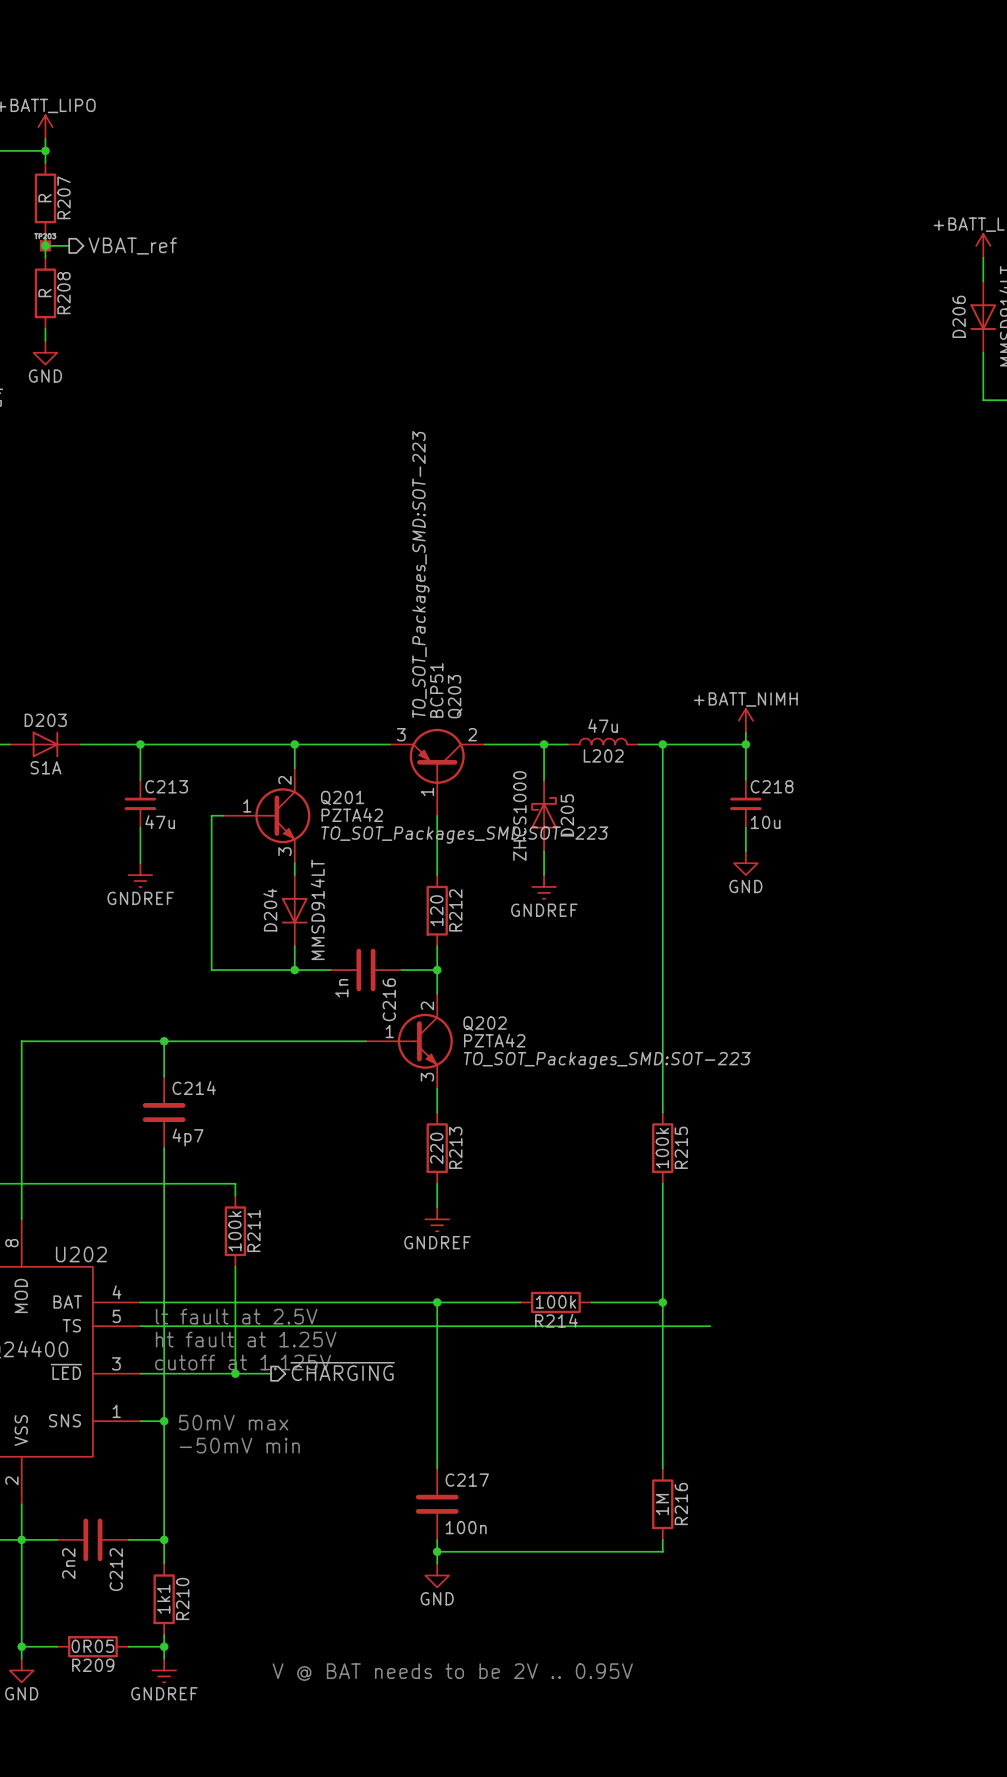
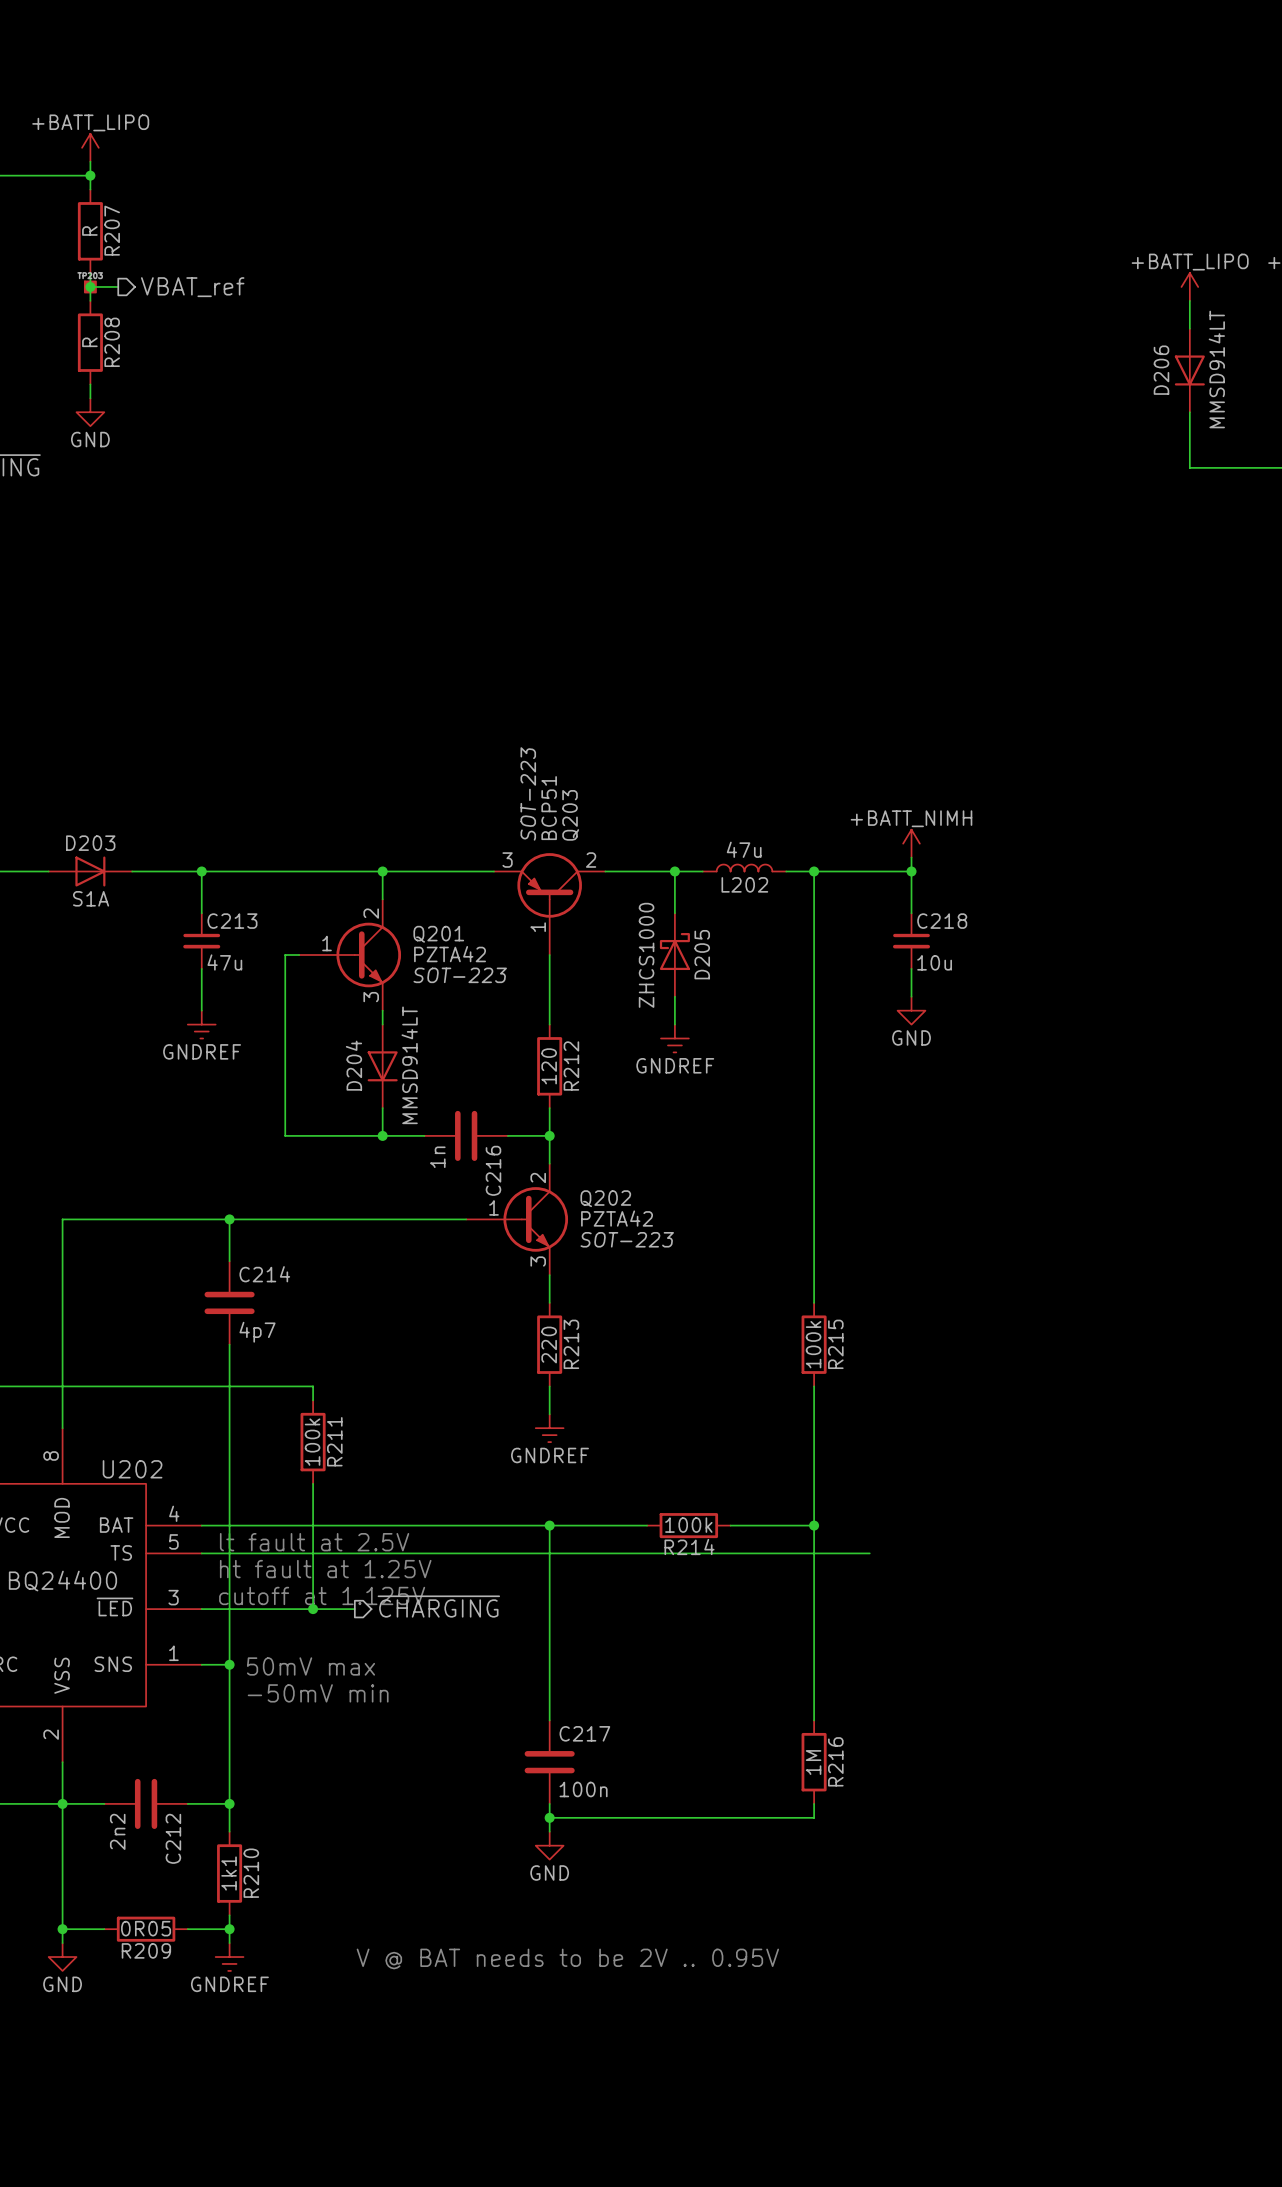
Q203 text: TO_SOT_Packages_SMD:SOT-223 (420, 574) -> SOT-223 (528, 793)
Q201 text: TO_SOT_Packages_SMD:SOT-223 (464, 835) -> SOT-223 (460, 975)
Q202 text: TO_SOT_Packages_SMD:SOT-223 (607, 1060) -> SOT-223 (627, 1239)

